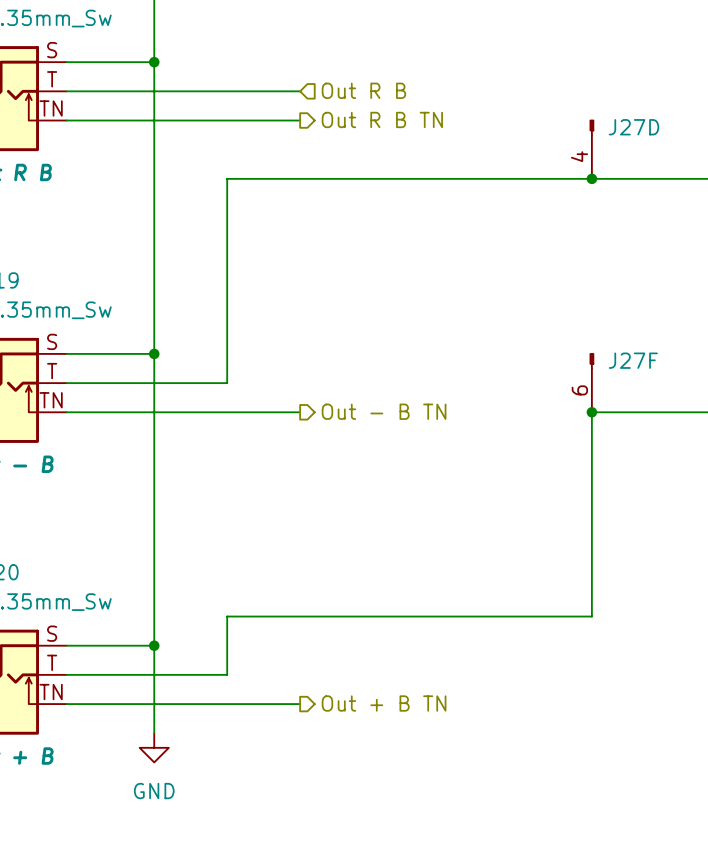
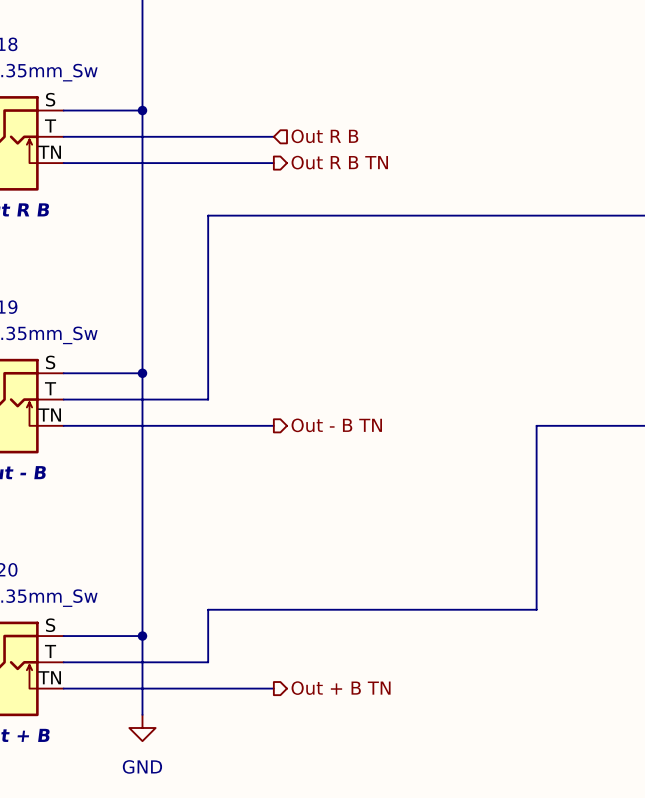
J27D: (591, 149) -> none
junction: (591, 178) -> none
J27F: (591, 382) -> none
junction: (591, 412) -> none

